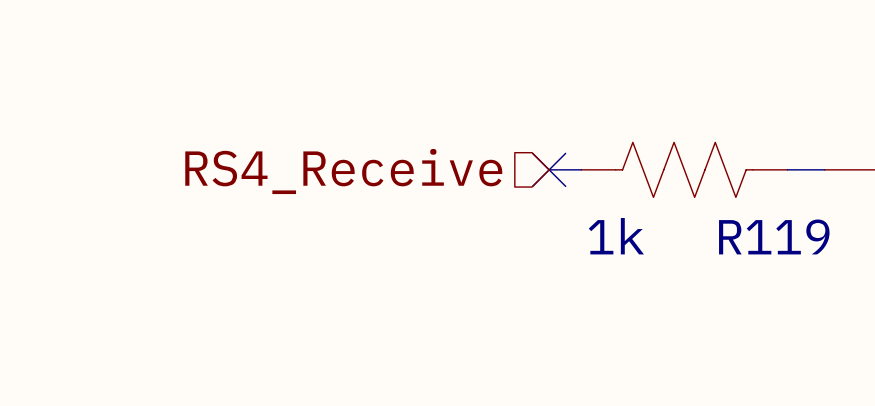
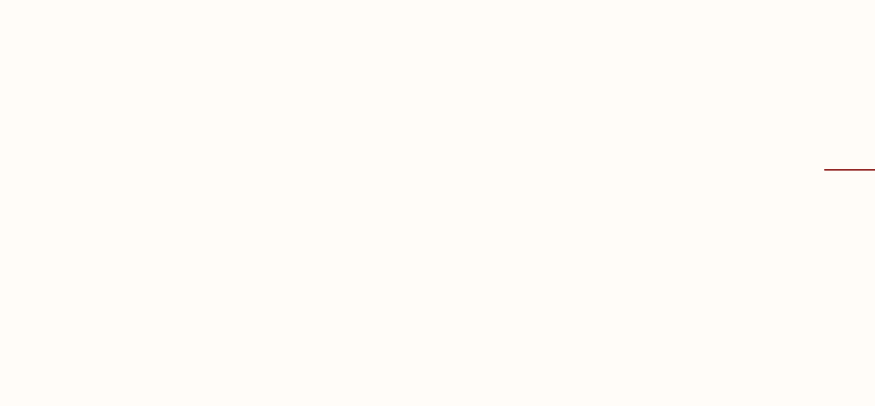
wire: (549, 169) (581, 169) -> none
no-connect mark: (549, 169) -> none
R119: 1k (684, 169) -> none
wire: (787, 169) (824, 169) -> none
hierarchical label: RS4_Receive (343, 171) -> none

